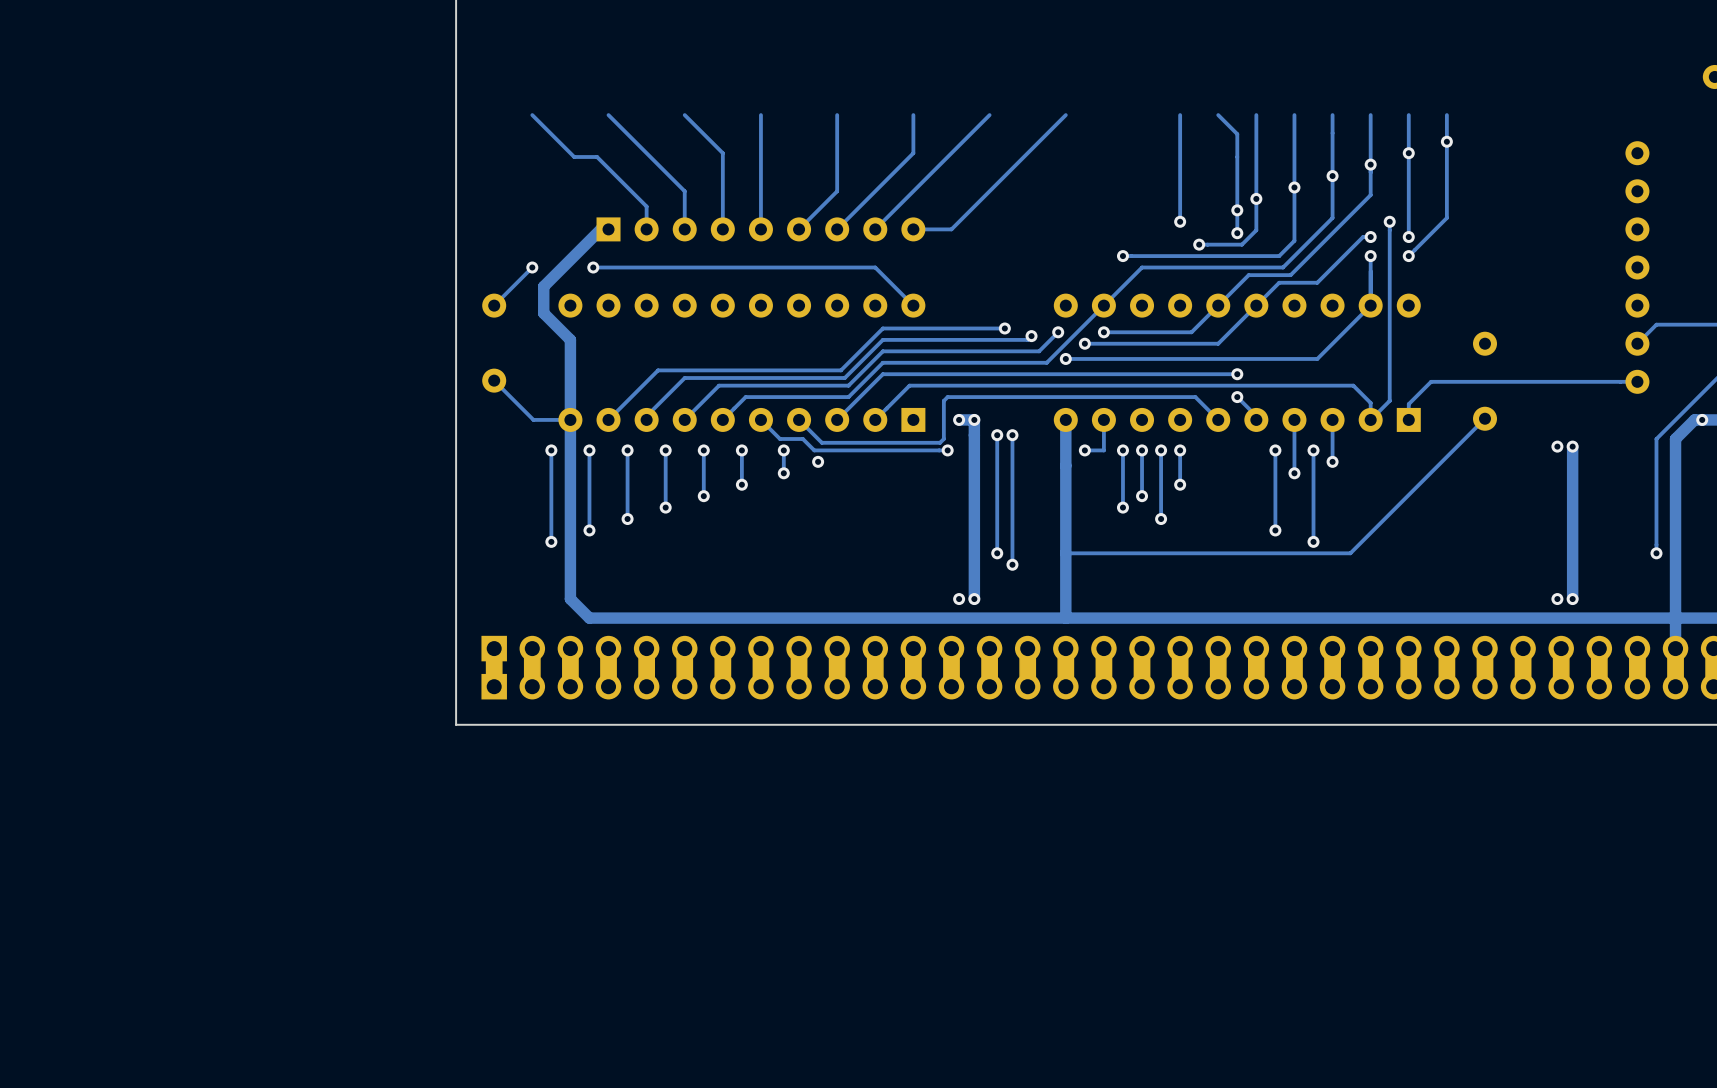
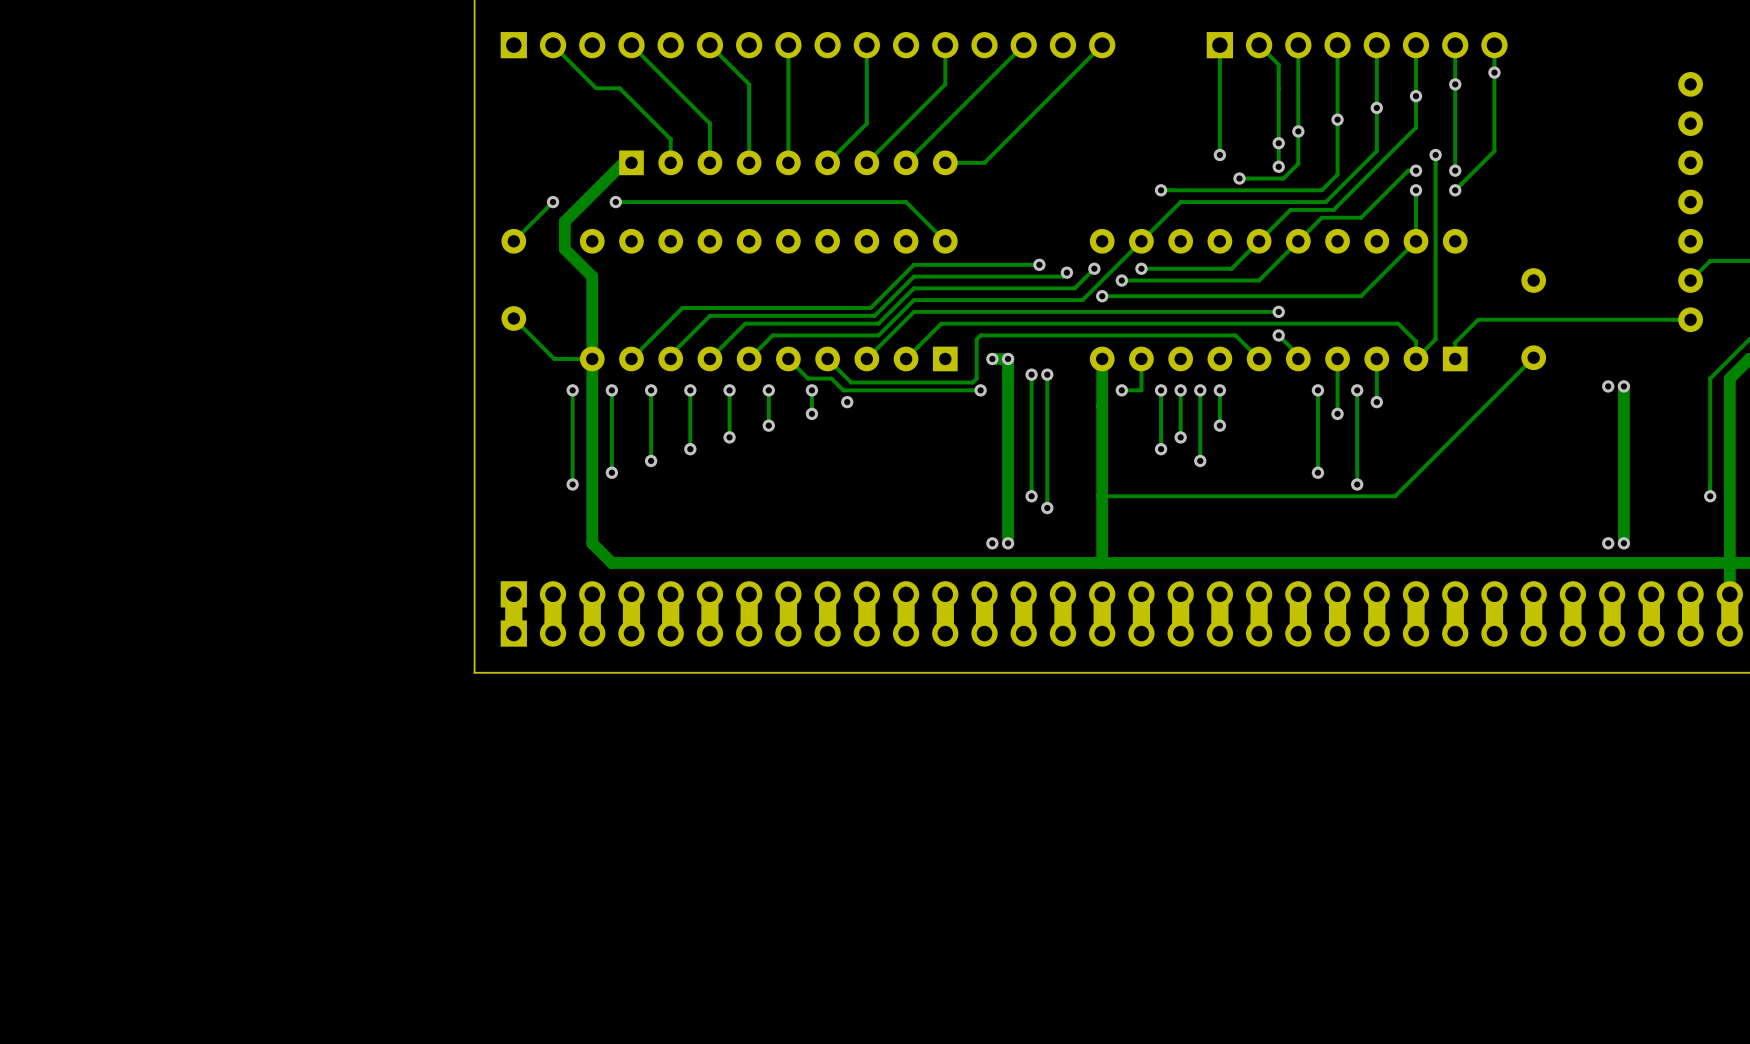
part: none -> (808, 45)
part: none -> (1357, 45)

